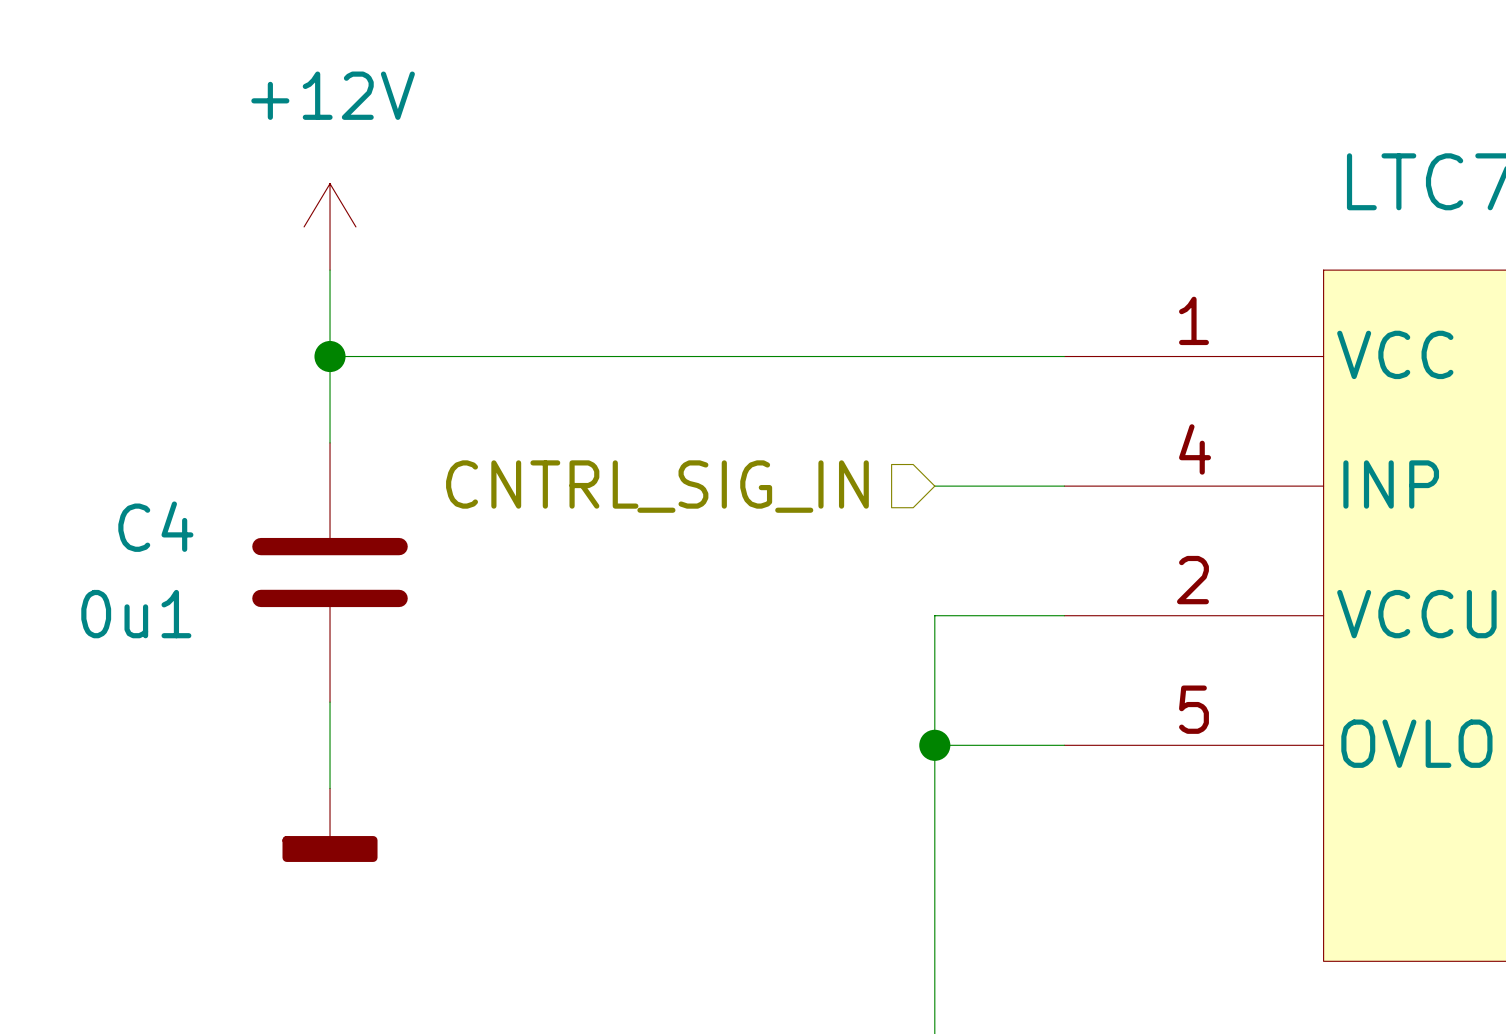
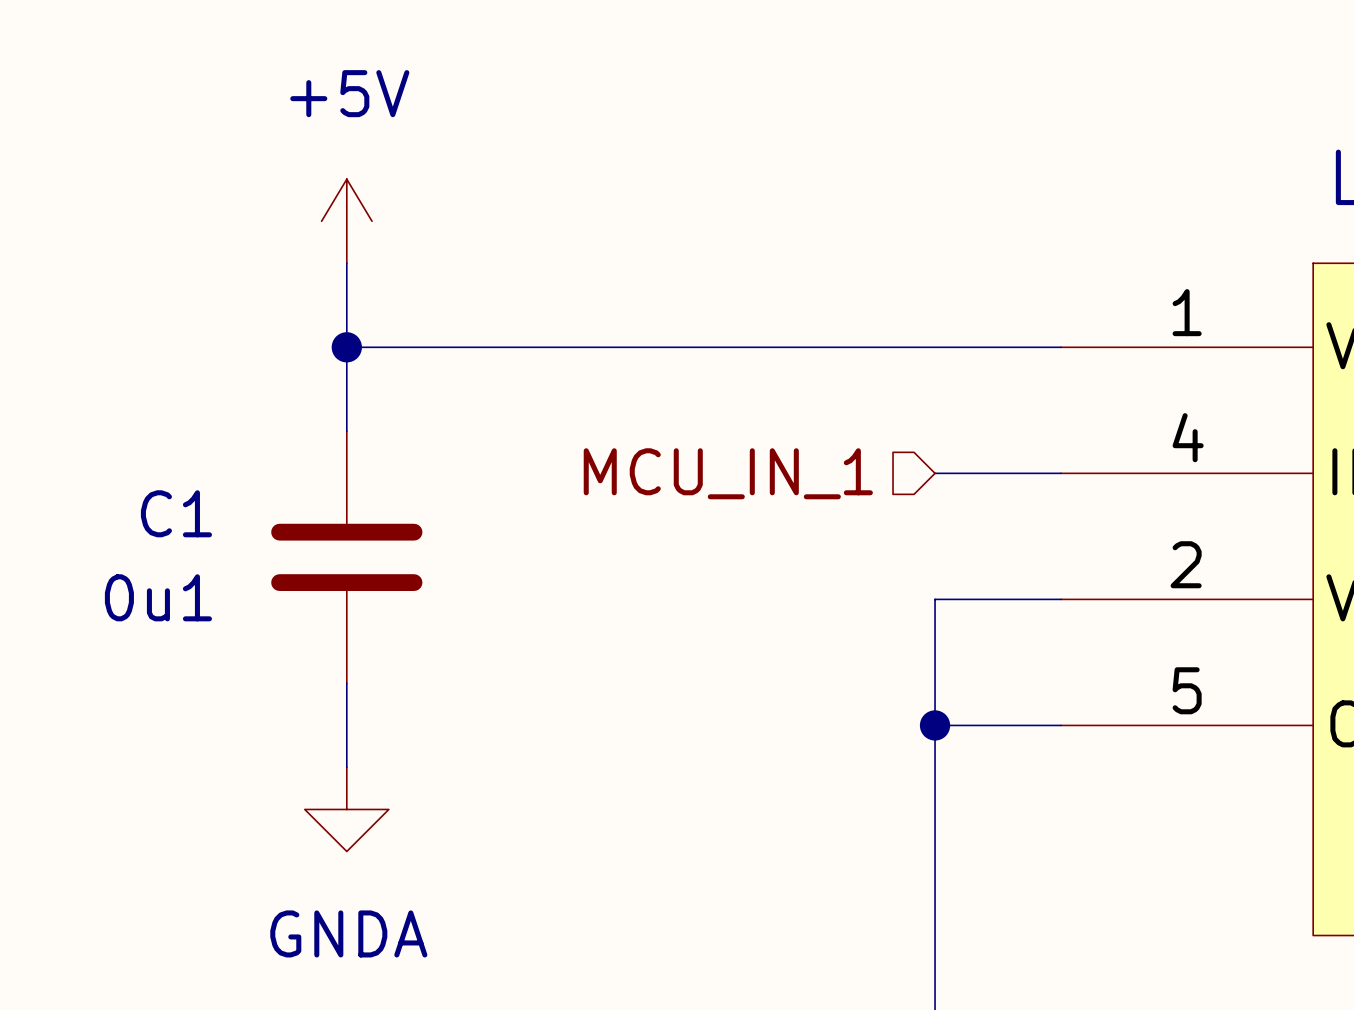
power symbol: +12V (330, 226) -> +5V (346, 221)
hierarchical label: CNTRL_SIG_IN (657, 486) -> MCU_IN_1 (728, 473)
C4 name: C4 (155, 526) -> C1 (176, 513)
power symbol shape: [282, 788, 378, 862] -> [304, 767, 389, 852]
power symbol text: none -> GNDA (348, 933)

